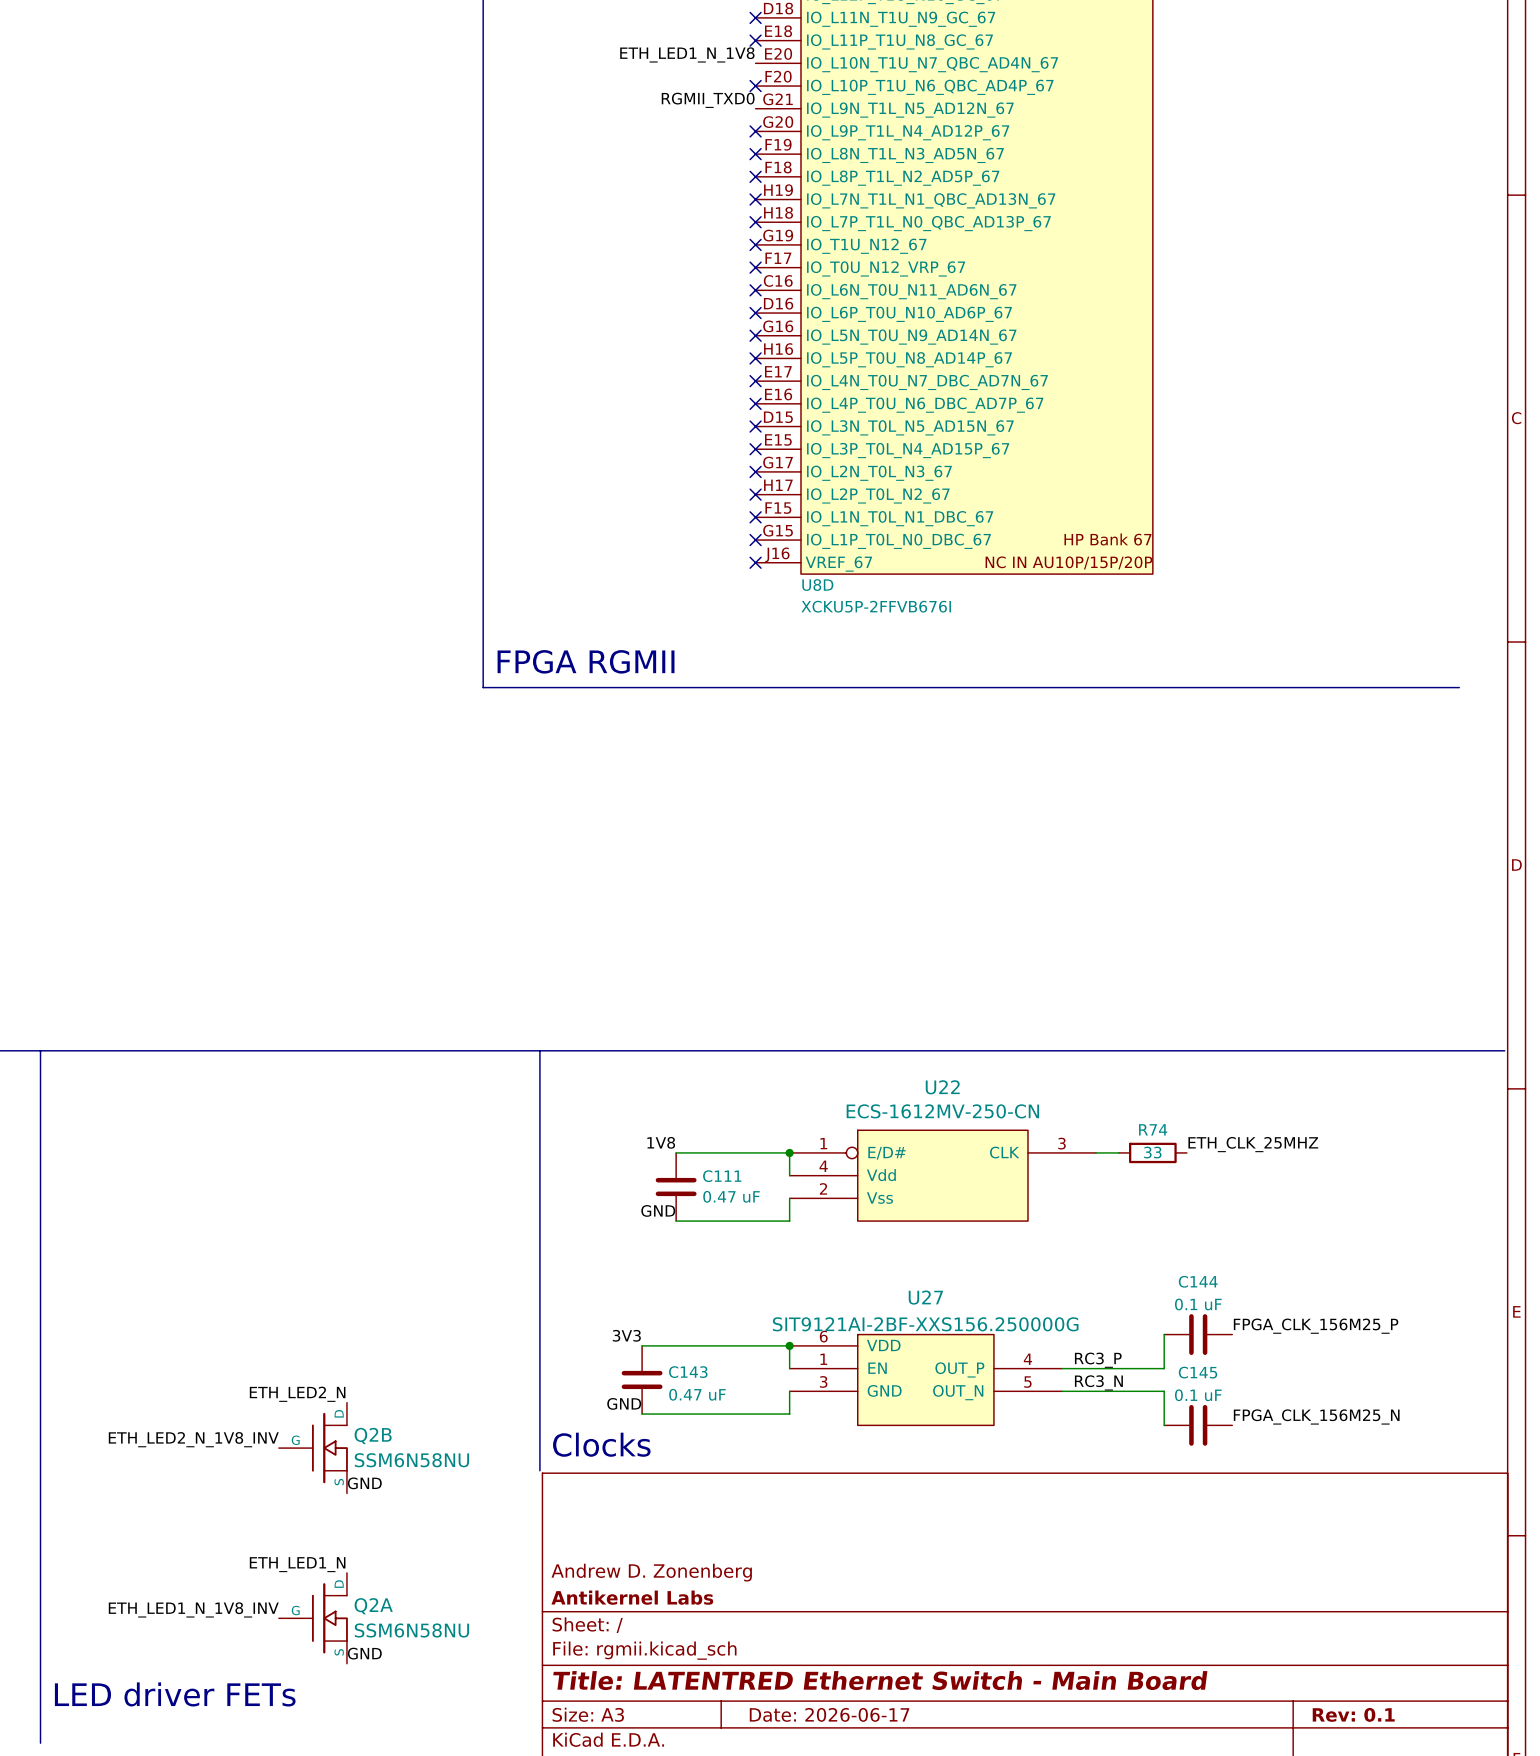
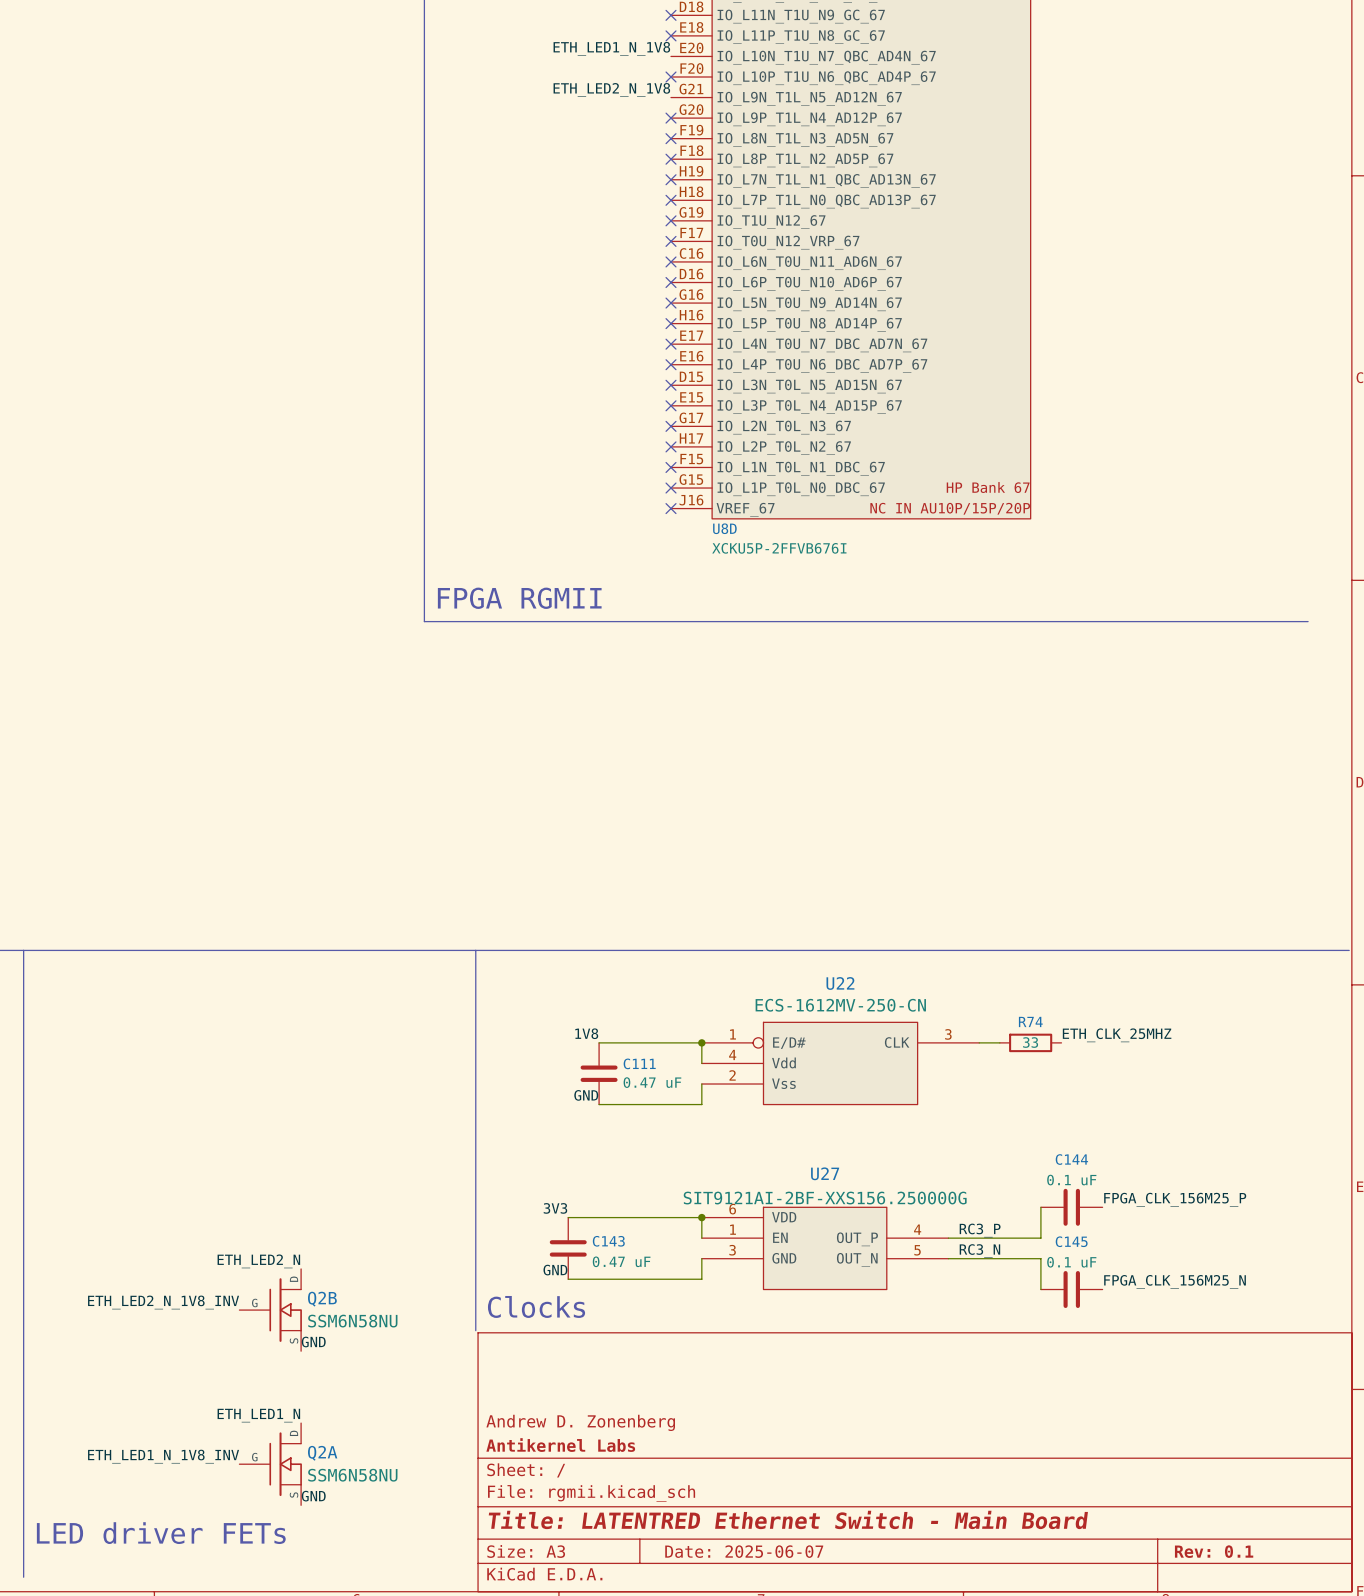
label: RGMII_TXD0 (708, 100) -> ETH_LED2_N_1V8 (611, 89)
title block: Date: 2026-06-17 (829, 1714) -> Date: 2025-06-07 (744, 1551)

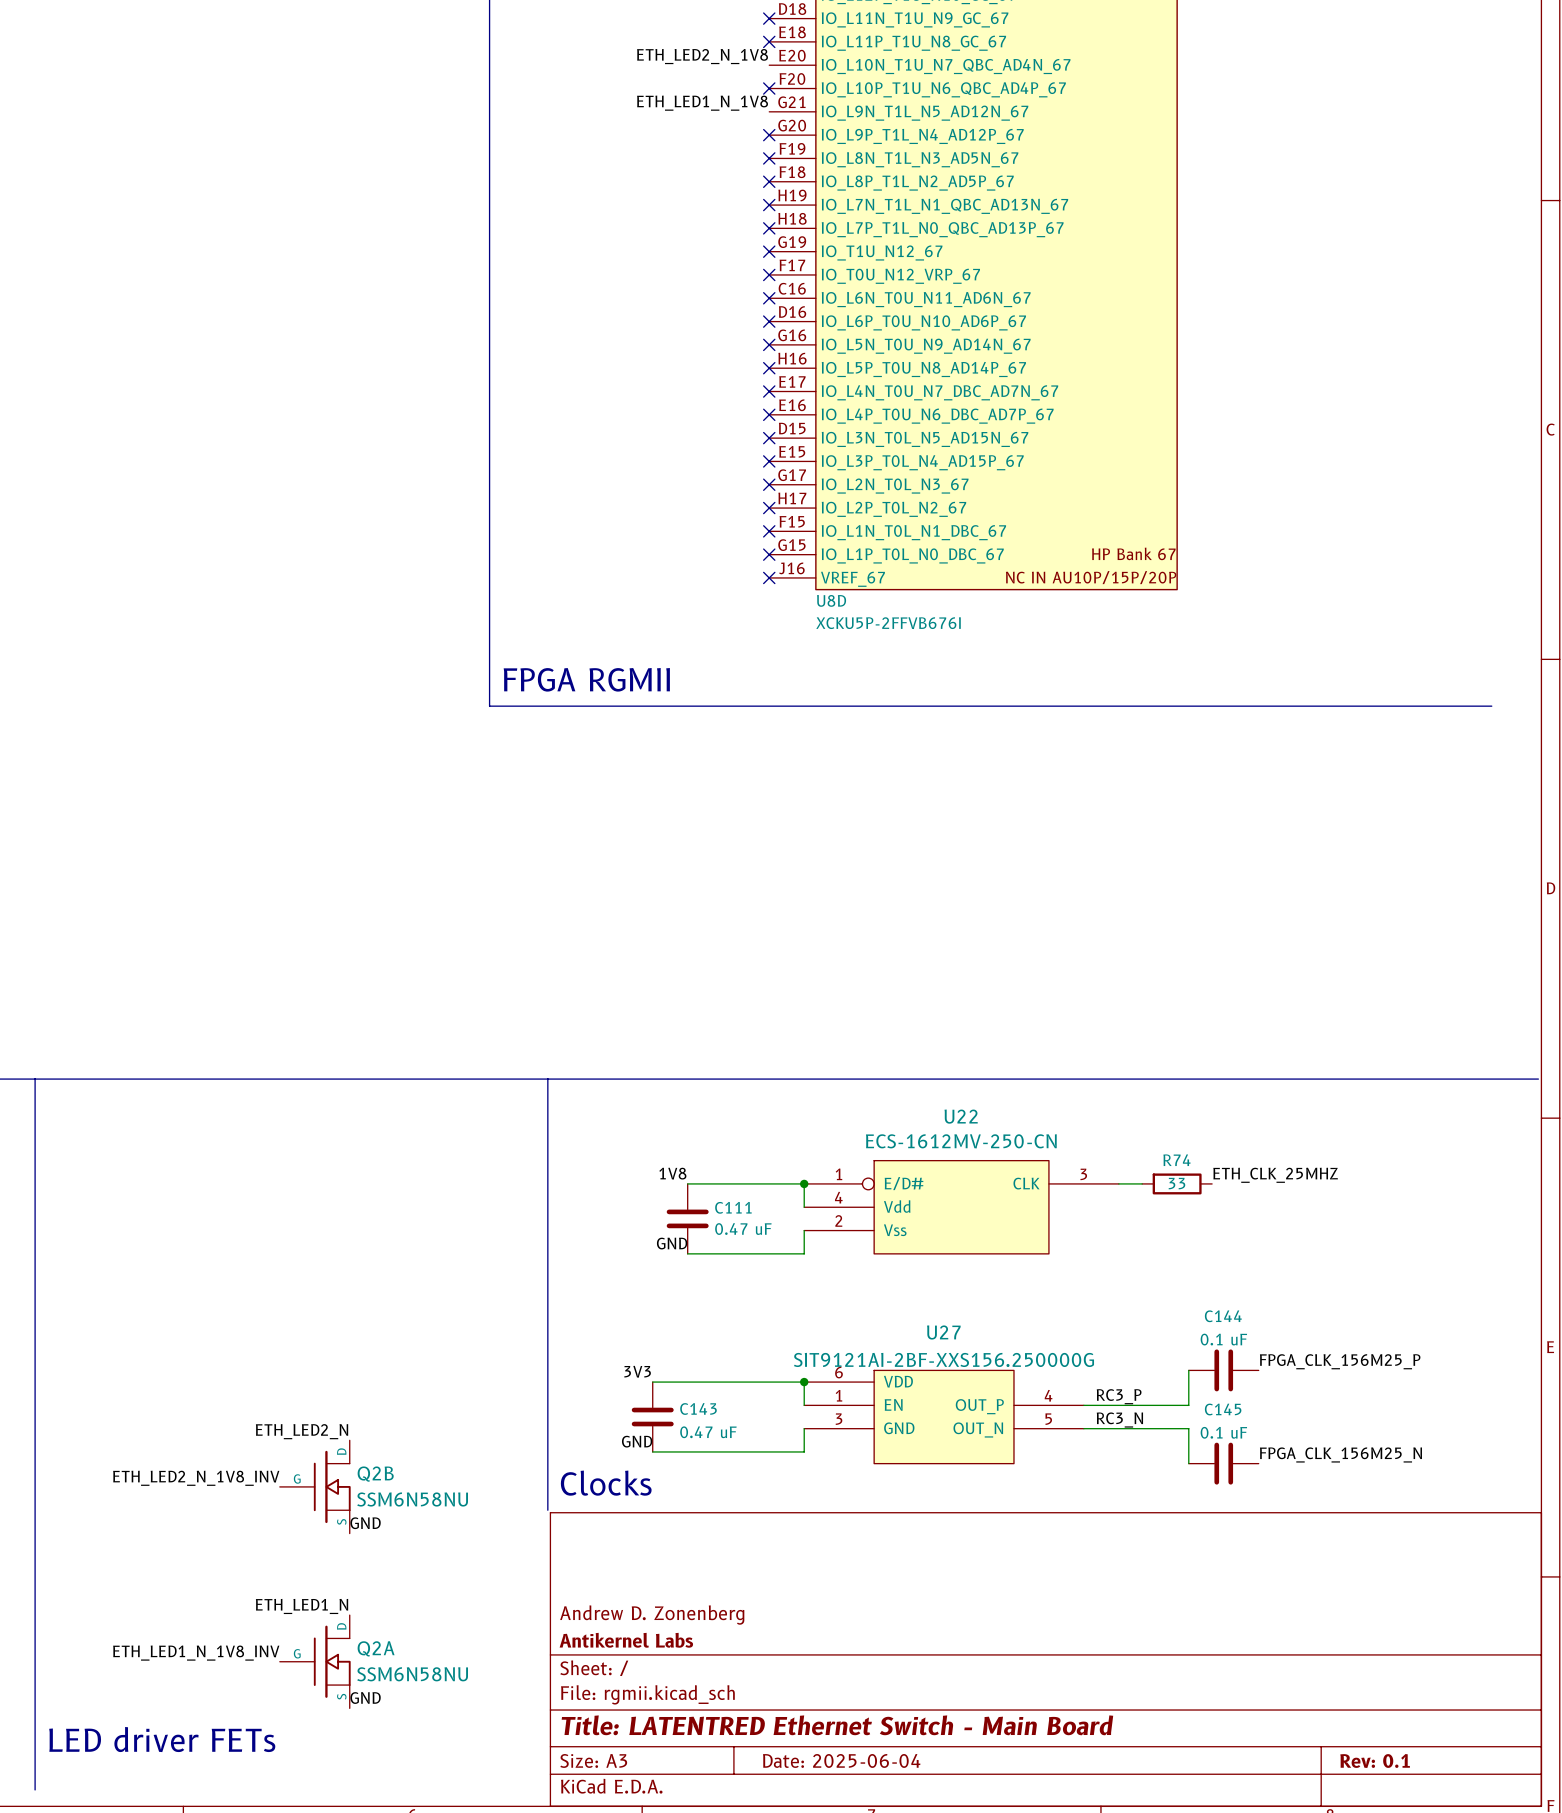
label: ETH_LED1_N_1V8 (611, 48) -> ETH_LED2_N_1V8 (702, 56)
label: ETH_LED2_N_1V8 (611, 89) -> ETH_LED1_N_1V8 (702, 103)
title block: Date: 2025-06-07 (744, 1551) -> Date: 2025-06-04 (841, 1760)

